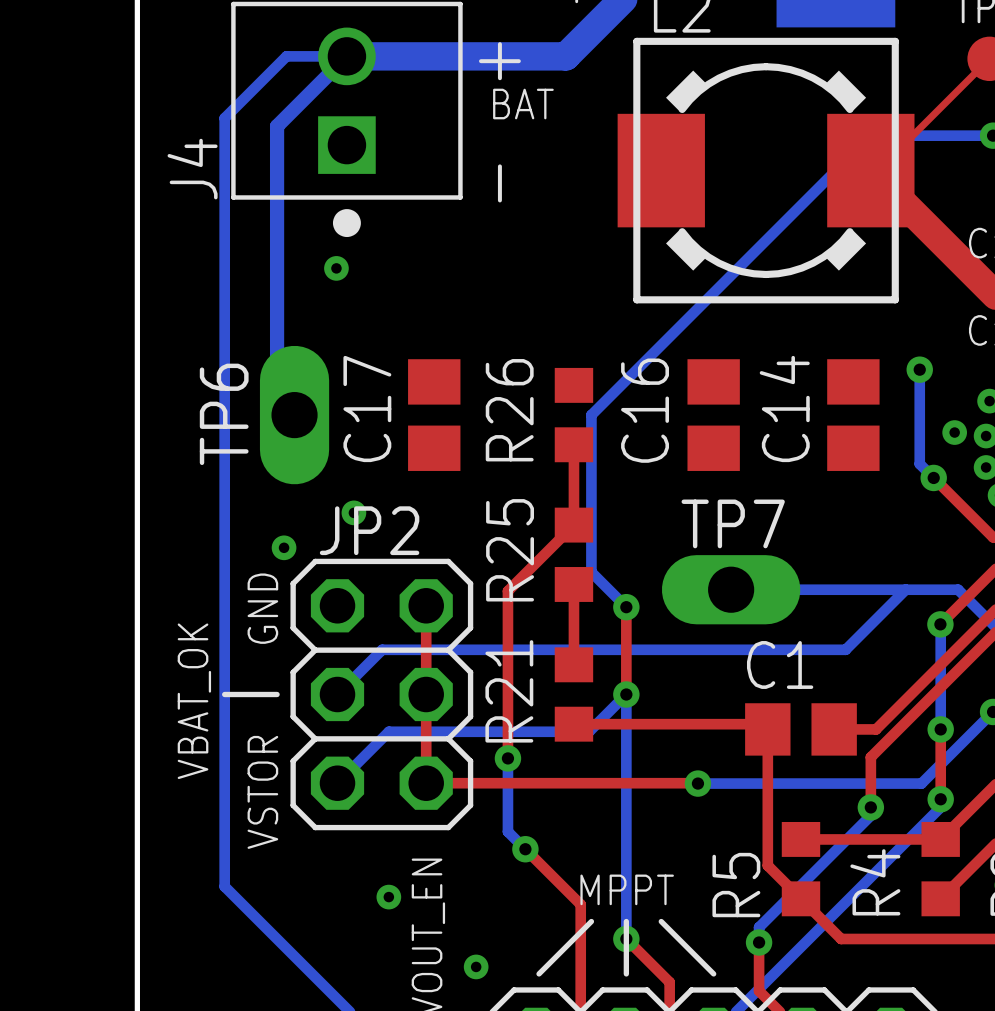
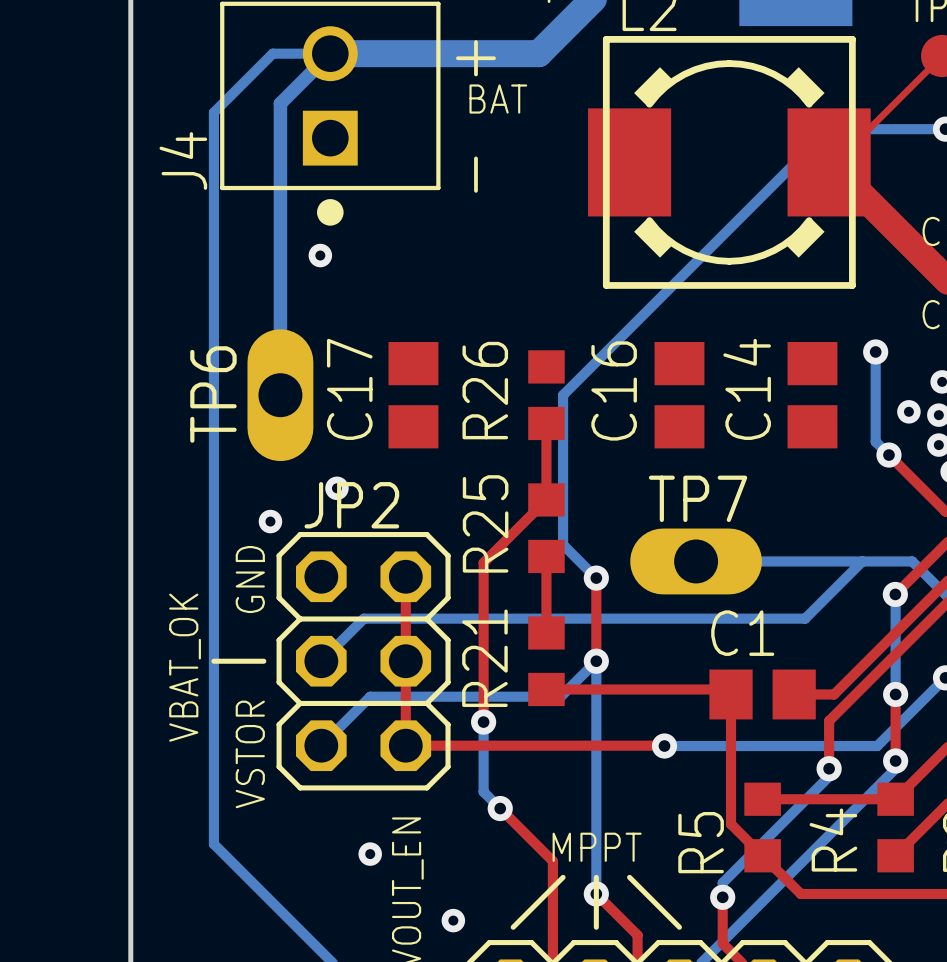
bottom track: (294, 108) (277, 126) (277, 397) (294, 415) -> (280, 103) (280, 378)

